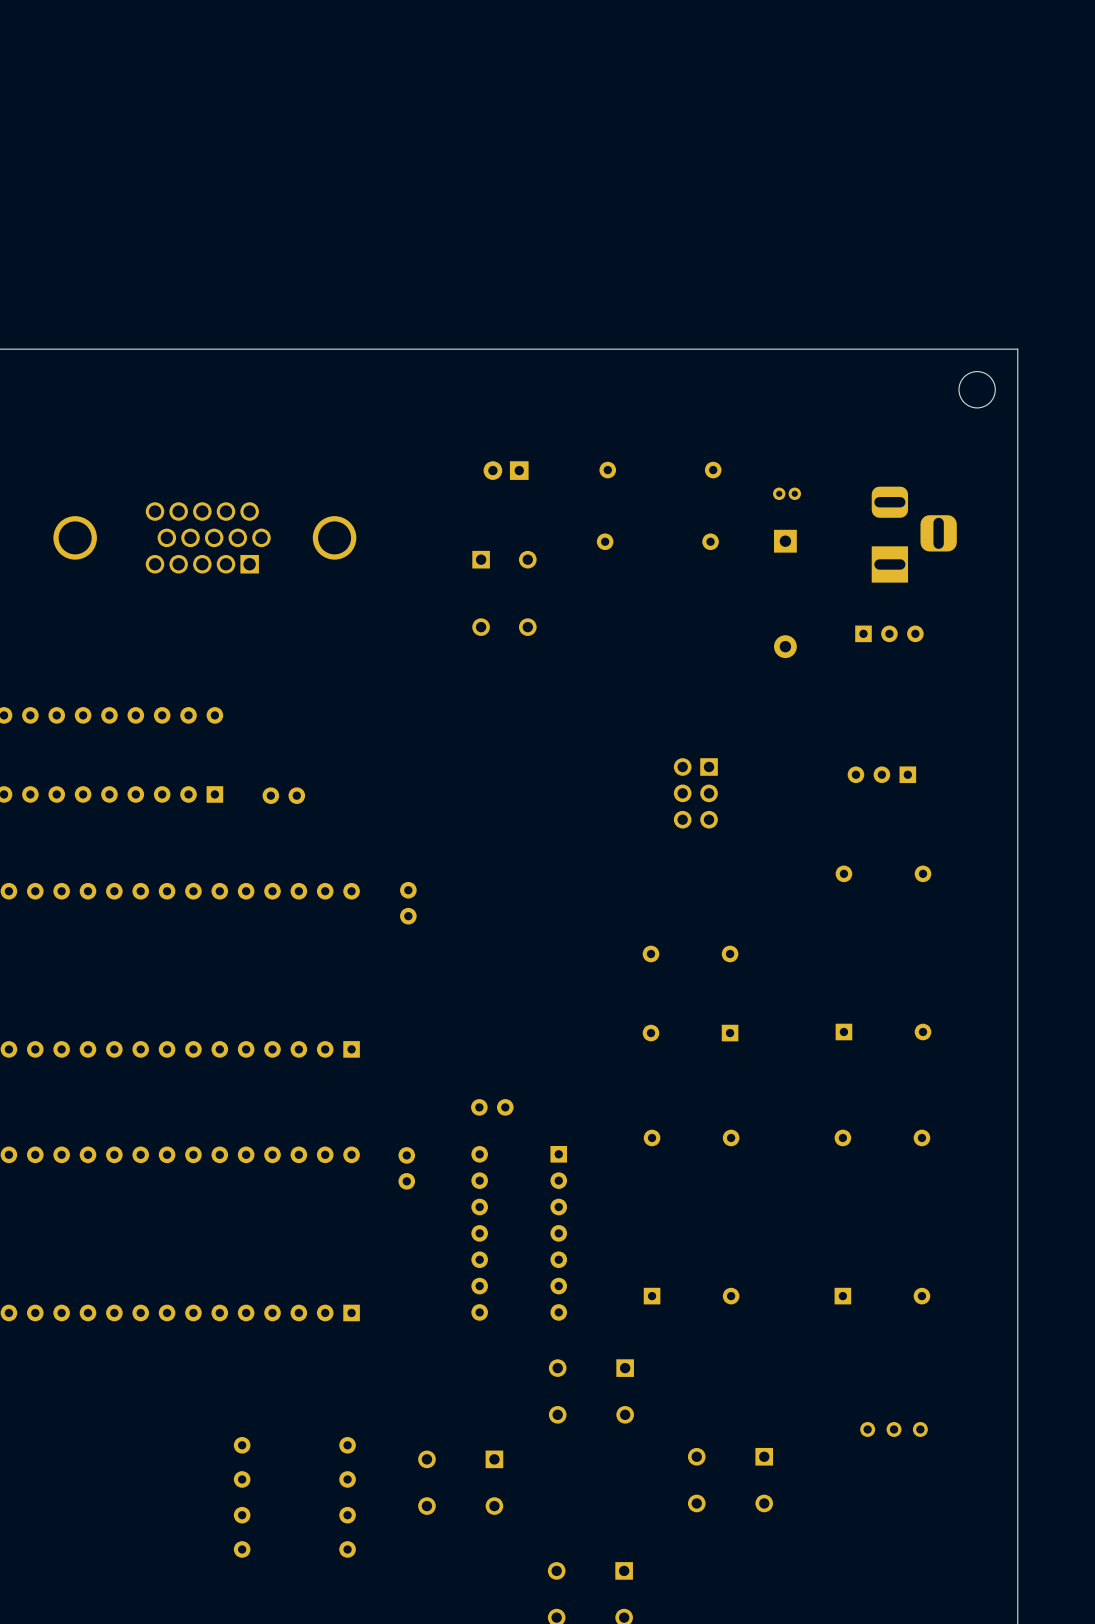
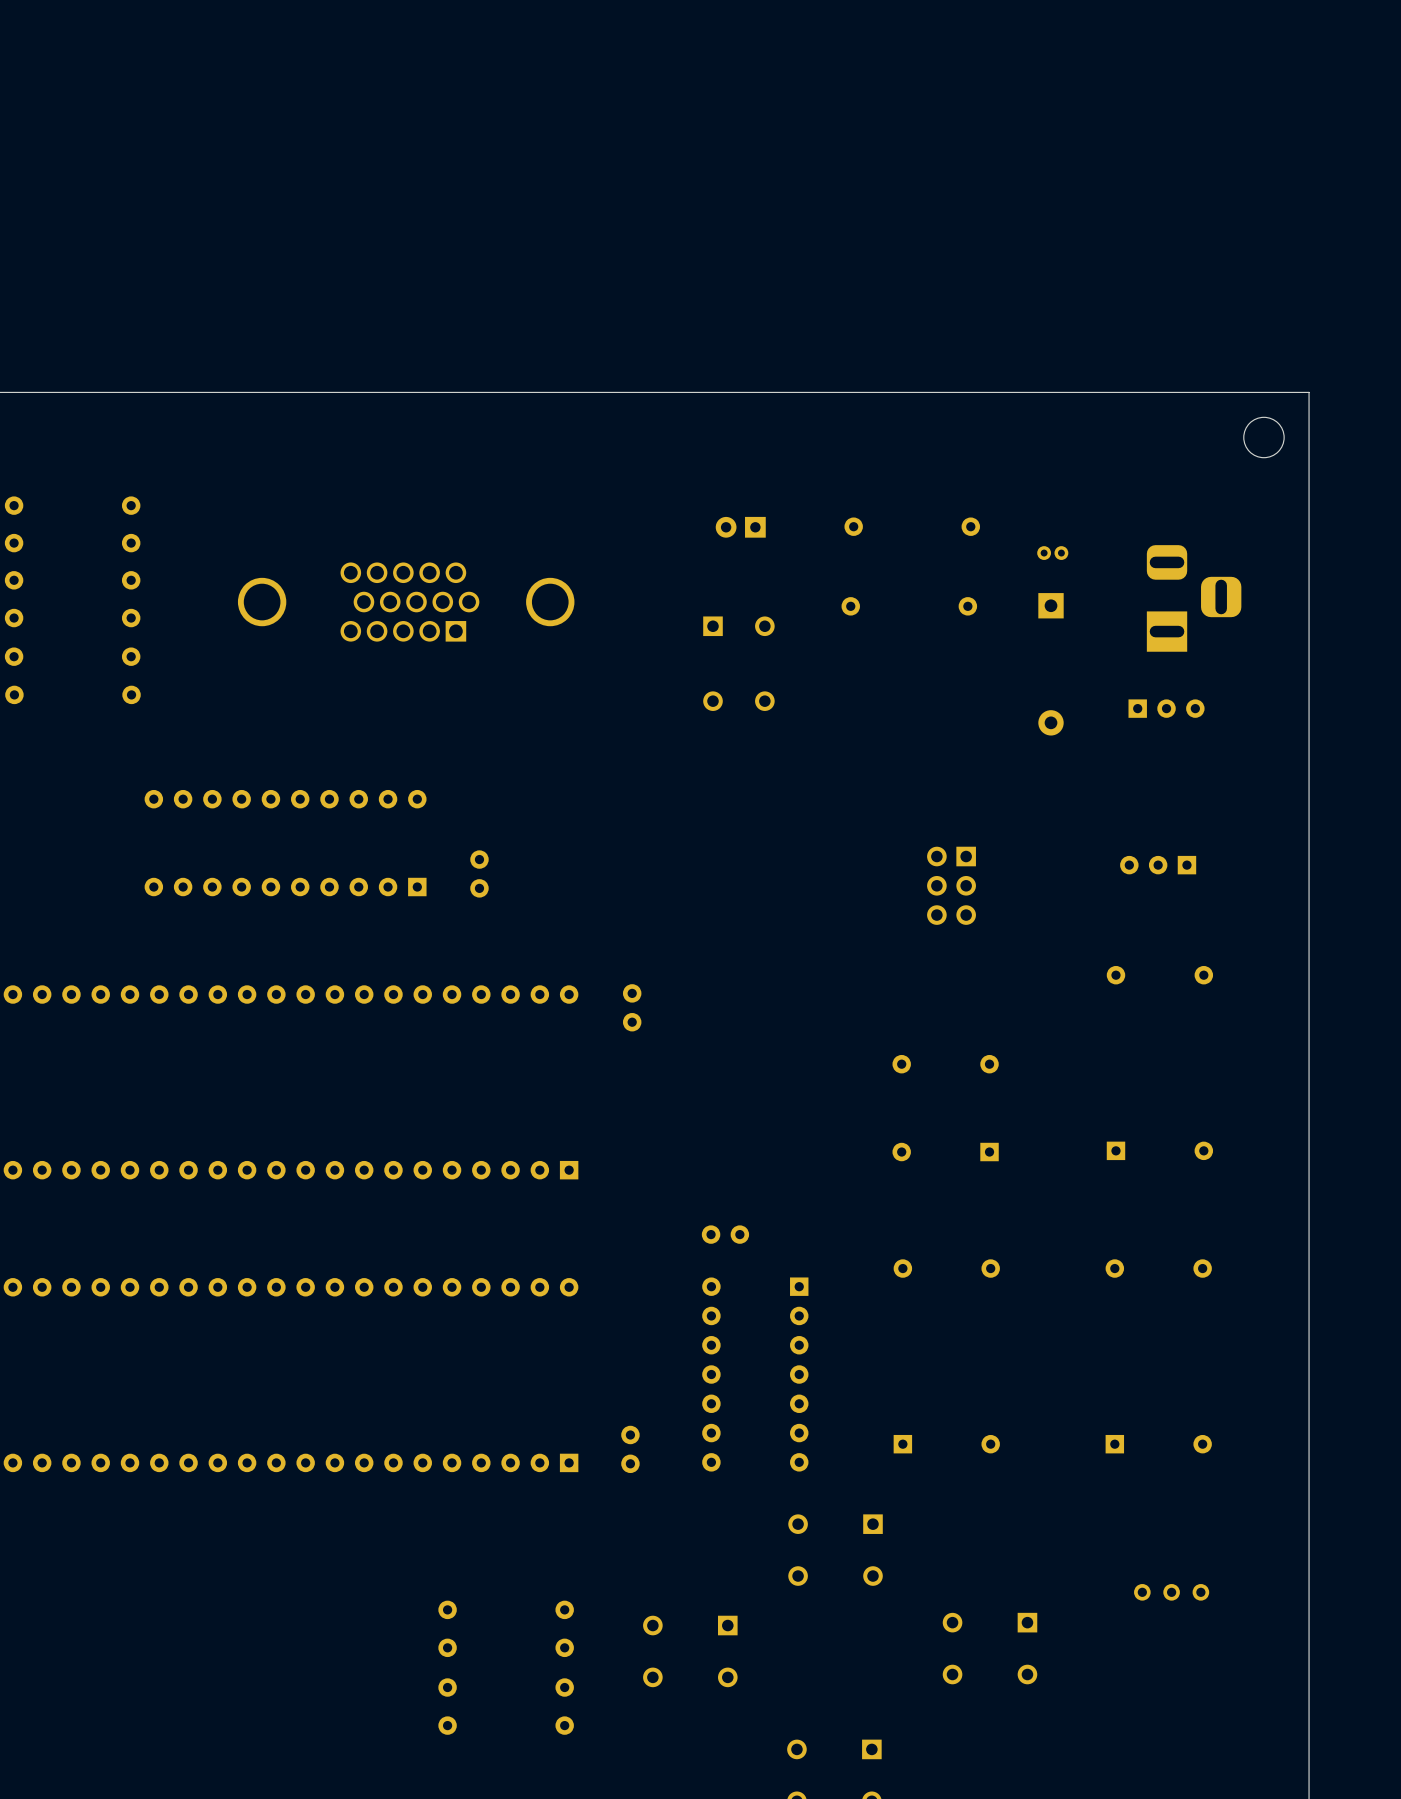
part rotation: 0° (283, 795) -> 90° clockwise (479, 873)
part position: (406, 1168) -> (630, 1449)

